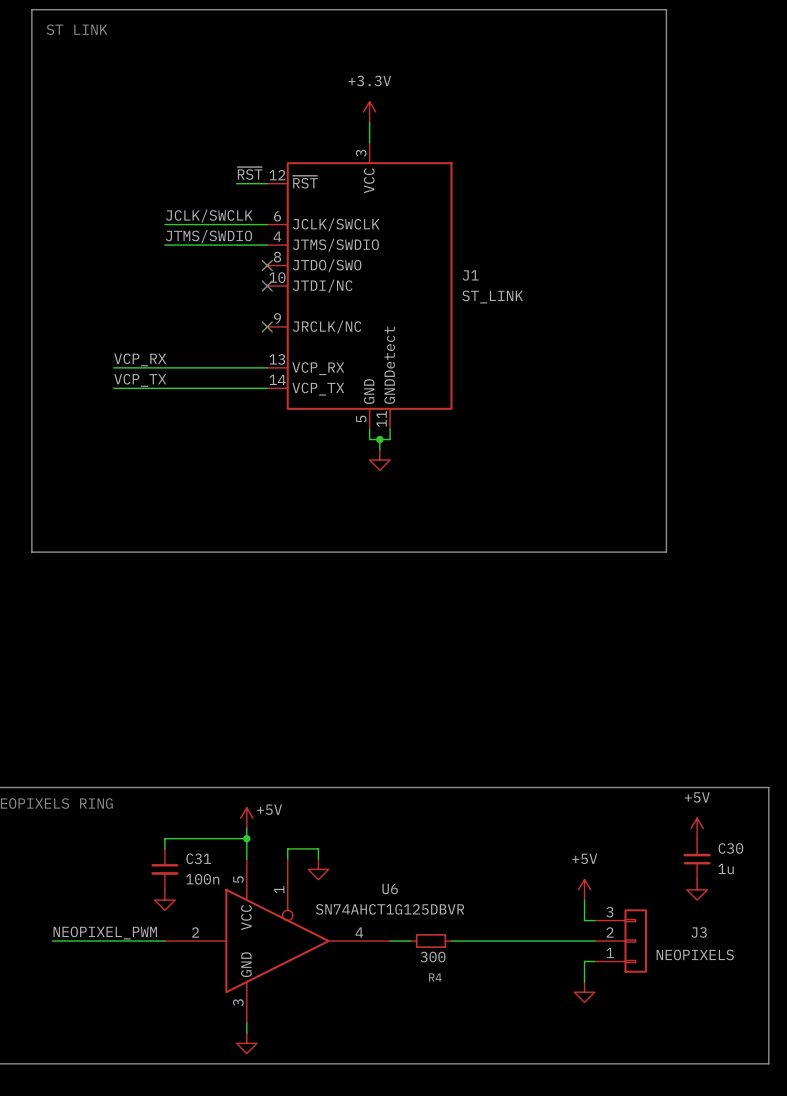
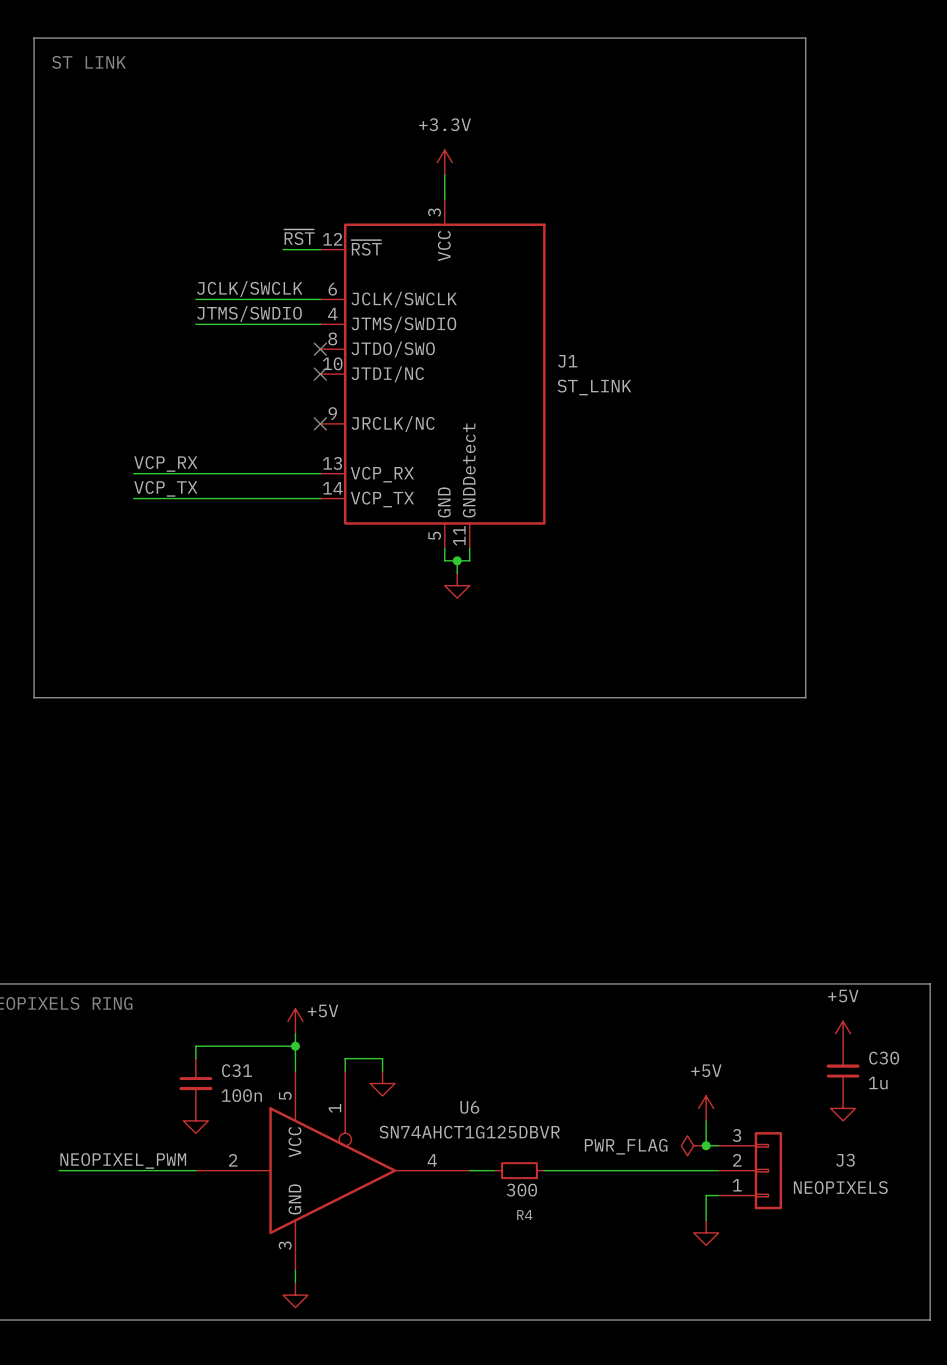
power symbol: none -> PWR_FLAG (693, 1145)
junction: none -> (706, 1145)

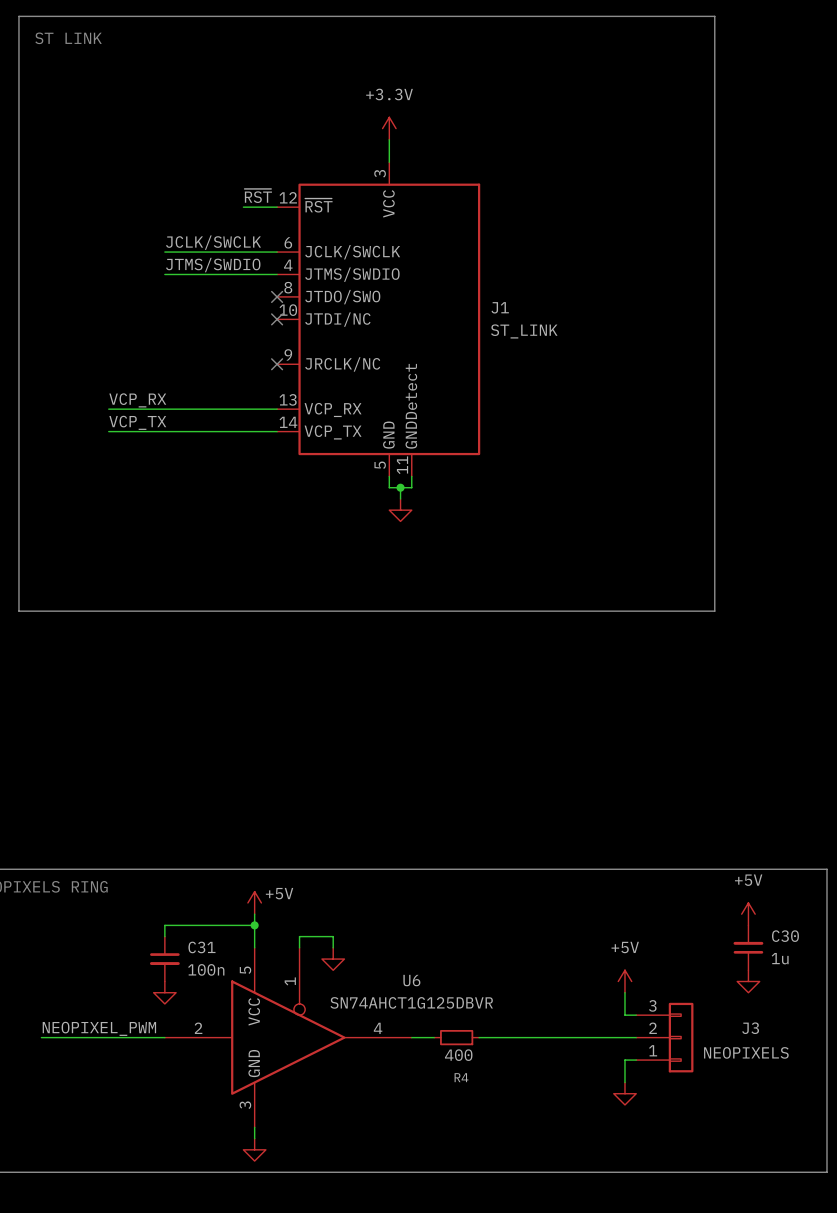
power symbol: PWR_FLAG (693, 1145) -> none
junction: (706, 1145) -> none
R4 value: 300 (521, 1190) -> 400 (458, 1055)

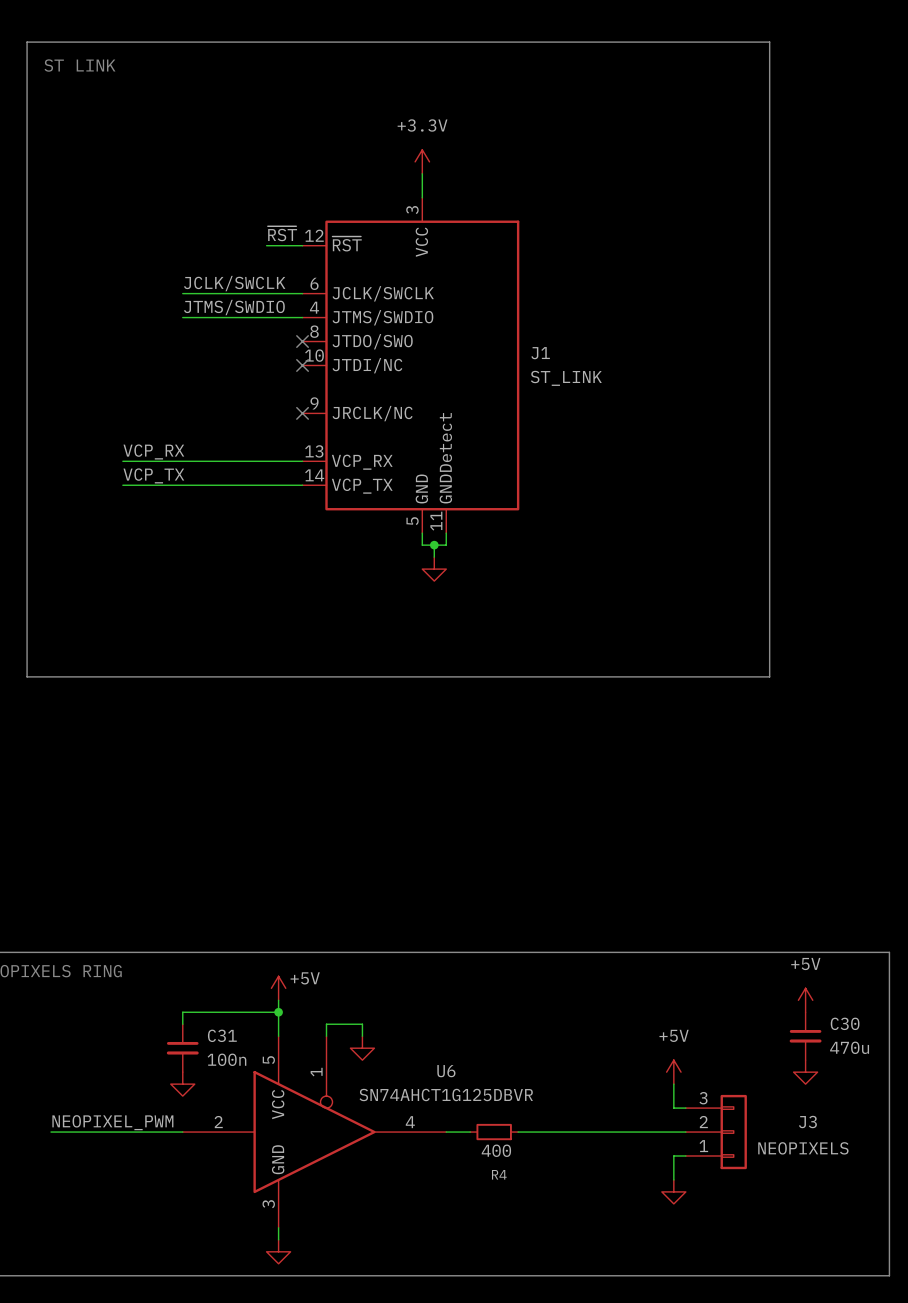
C30 rotation: 0° (748, 947) -> 180° (805, 1036)
C30 value: 1u (780, 958) -> 470u (849, 1047)

